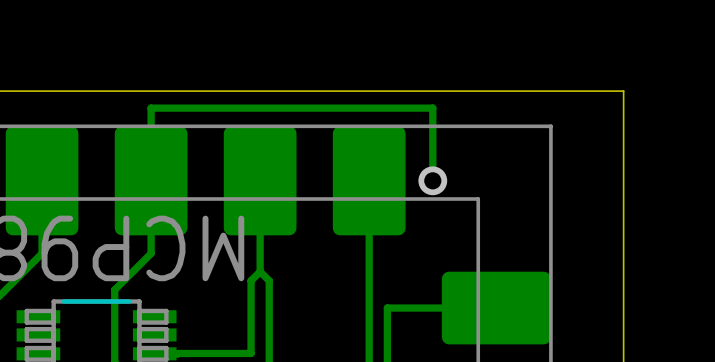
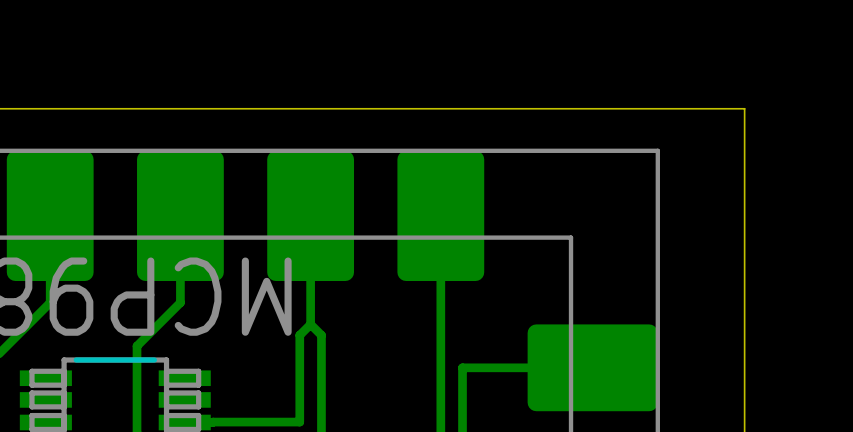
track: (432, 180) (432, 108) (151, 108) (151, 180) -> none
via: (432, 180) -> none

